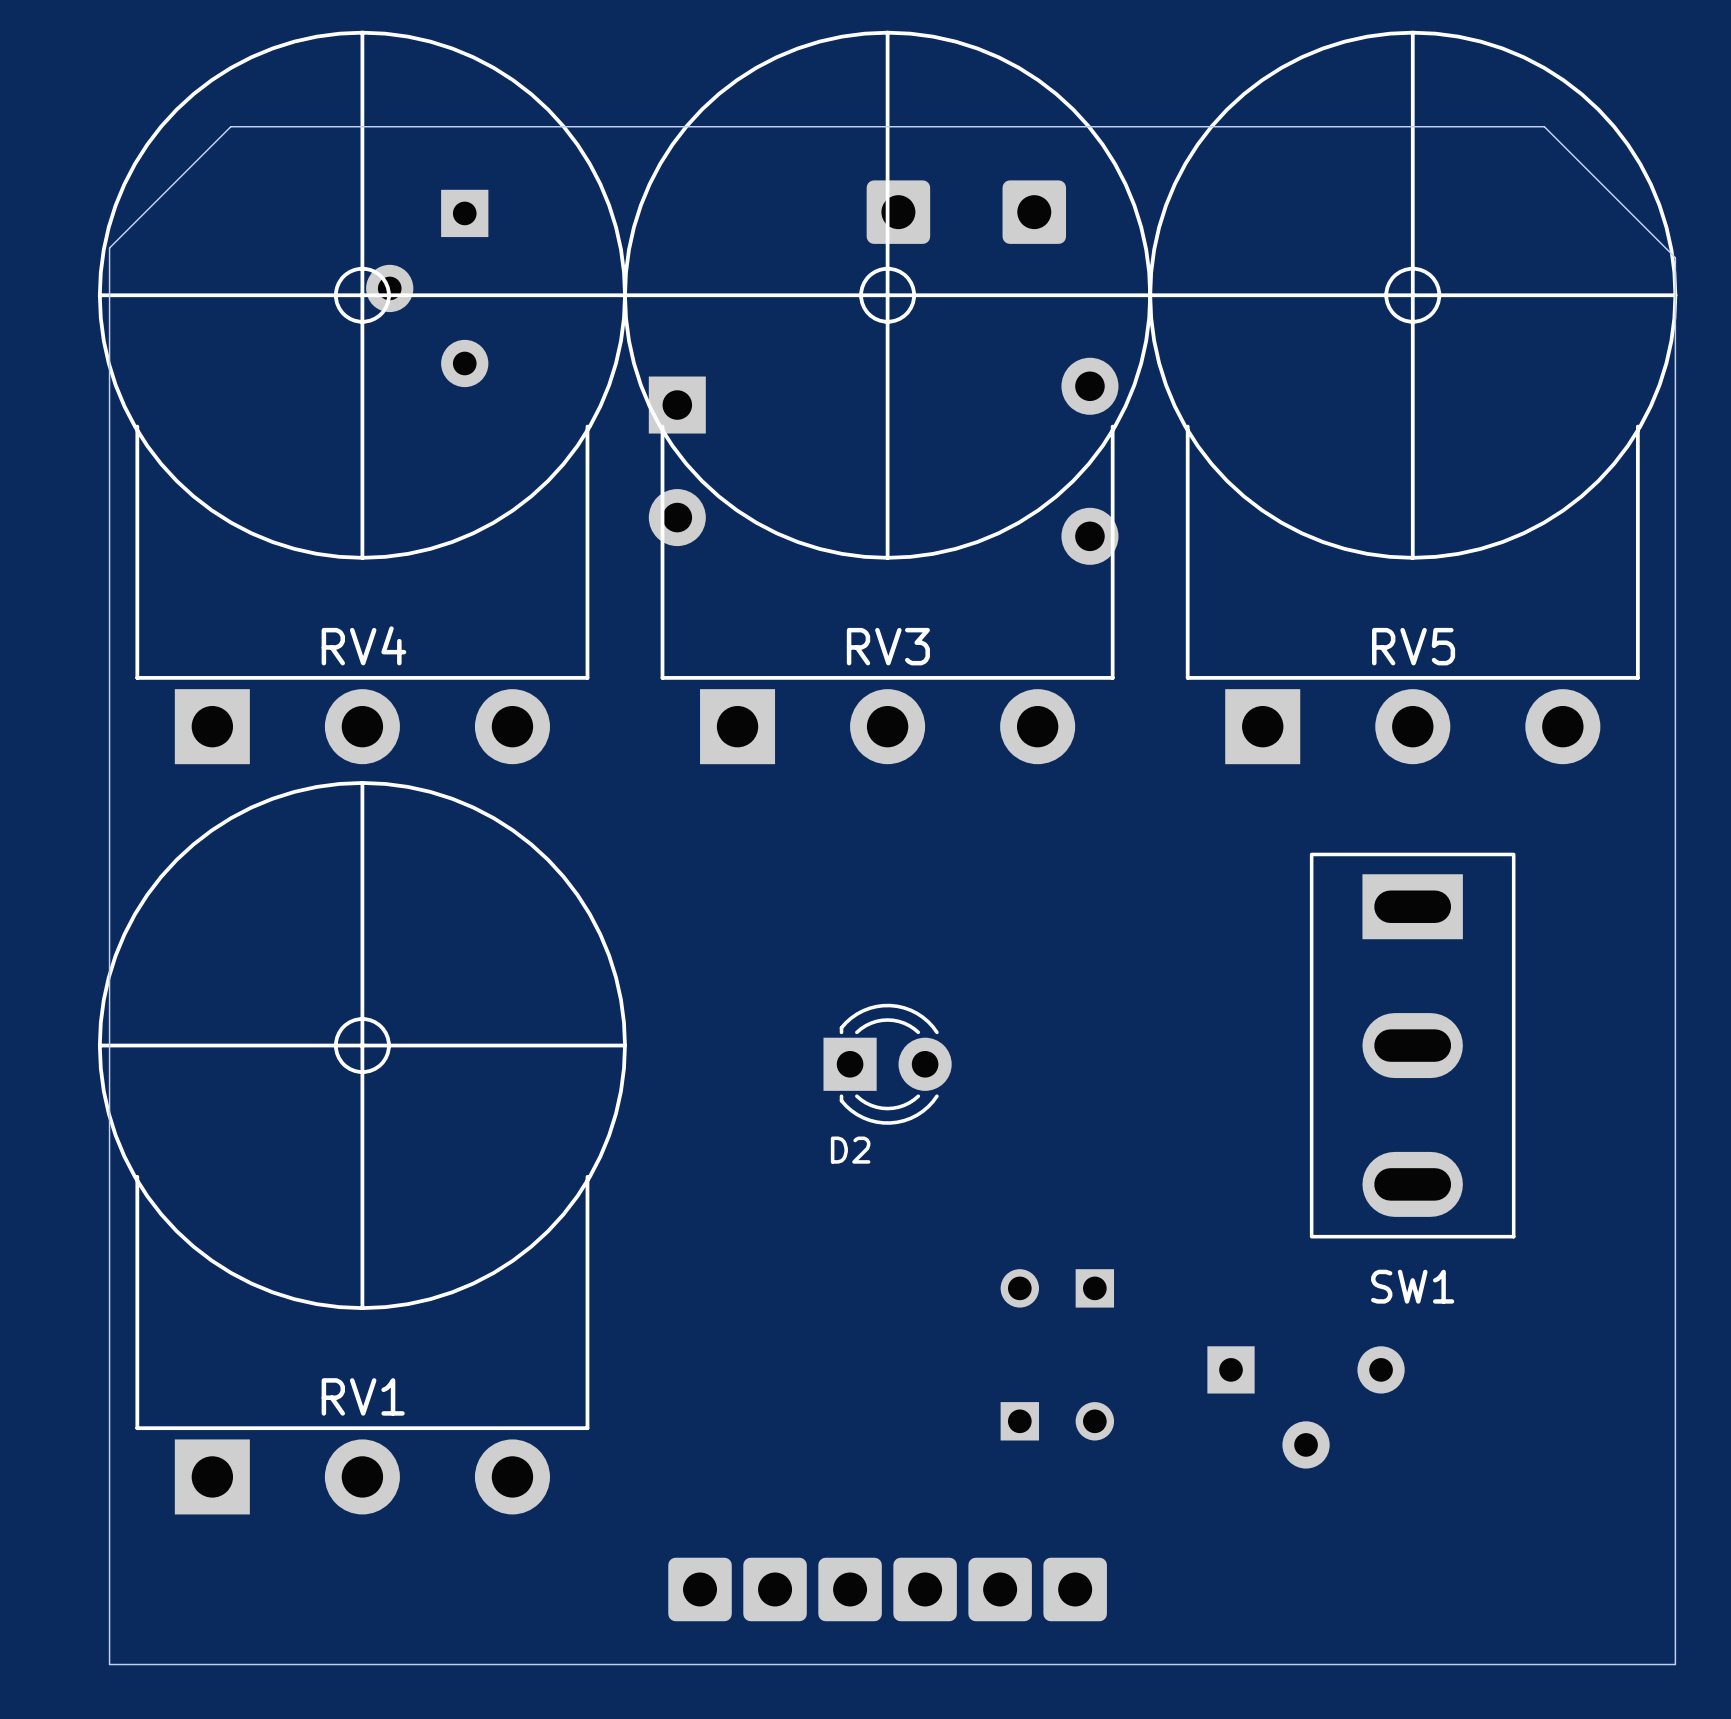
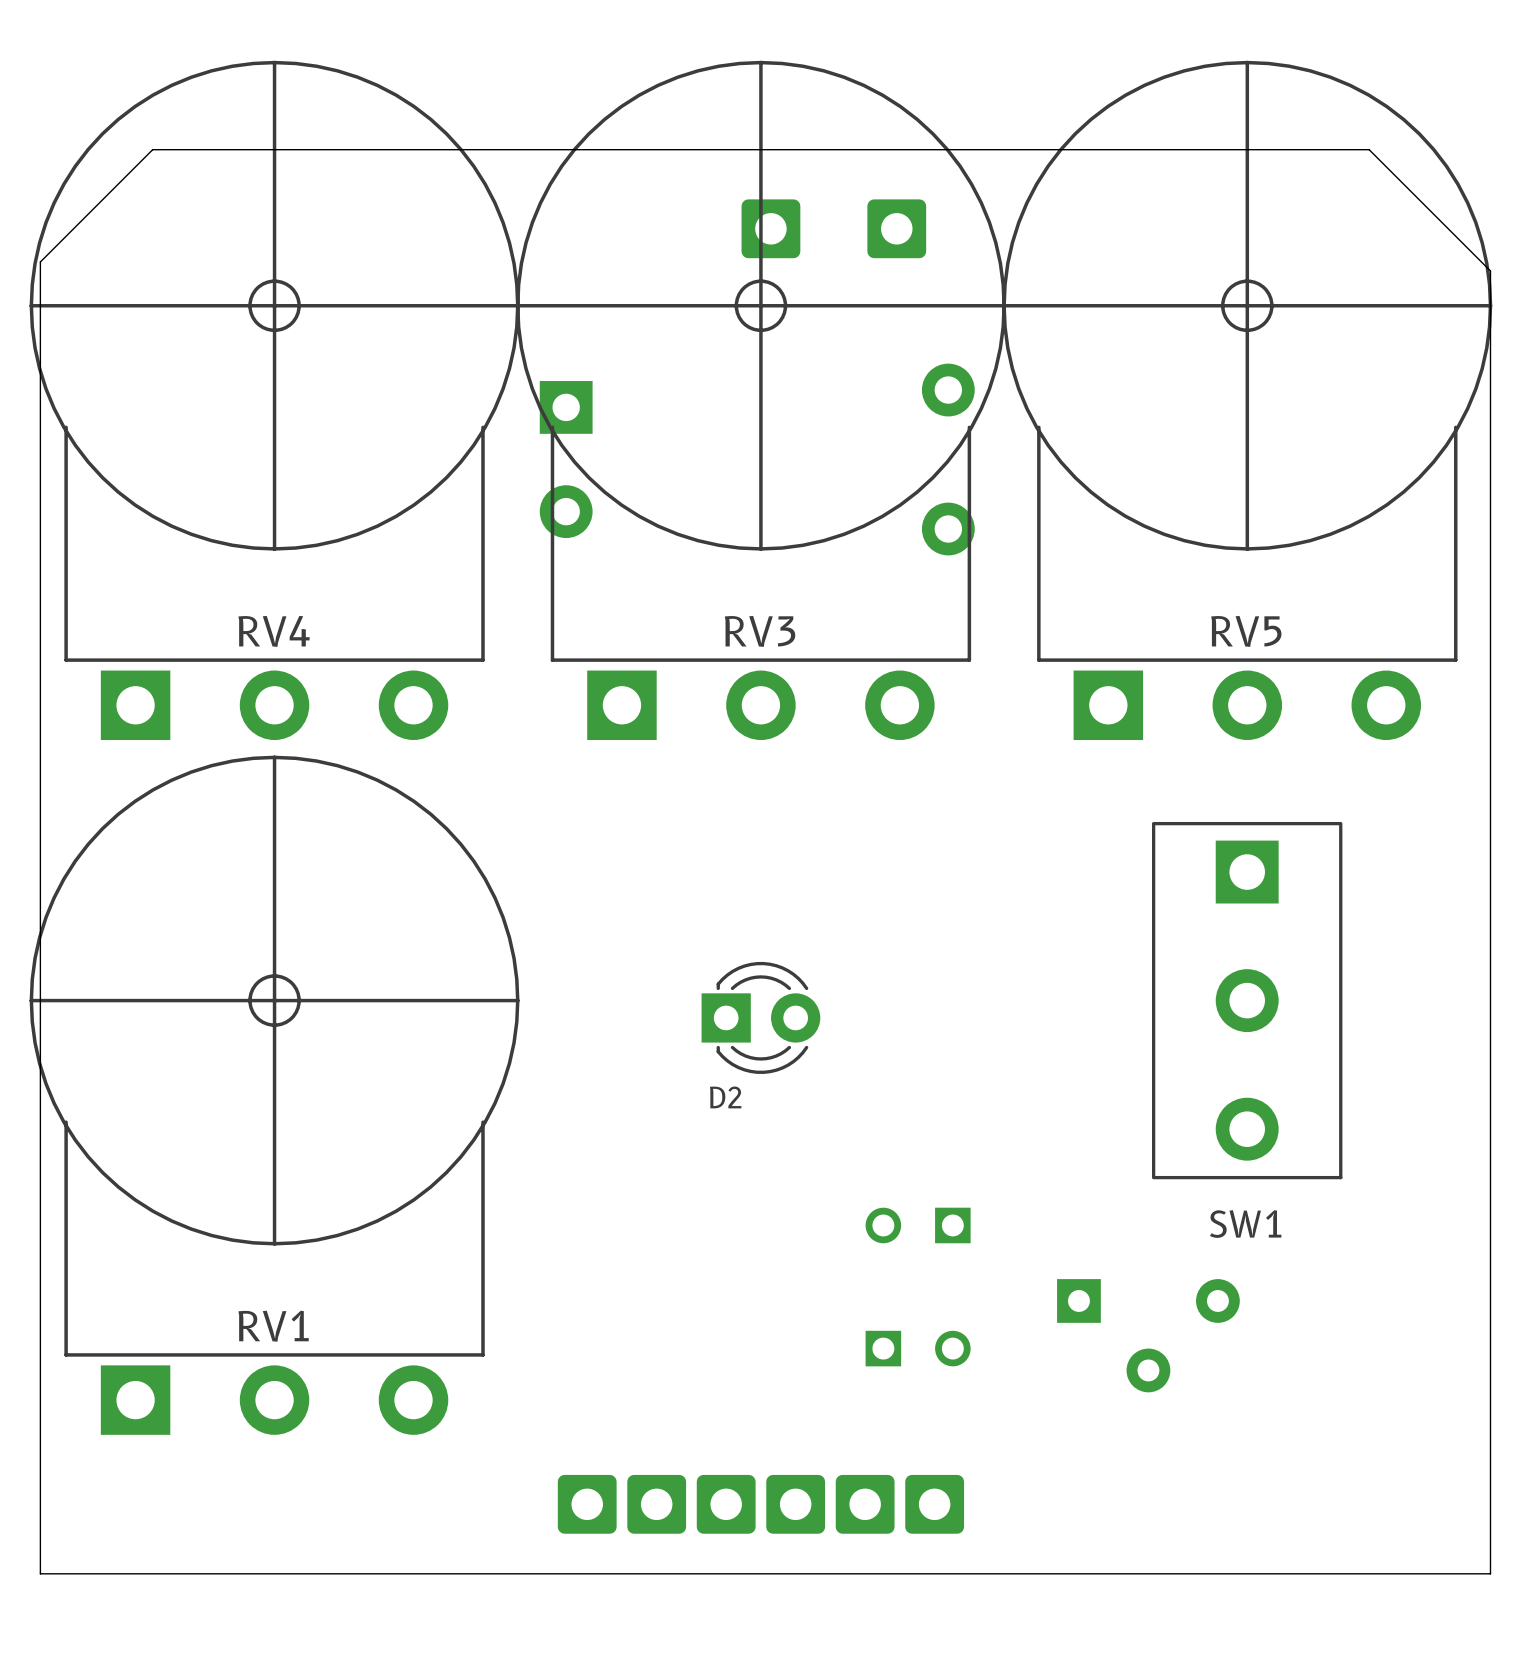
part: (427, 288) -> none
SW1 footprint: [1309, 852, 1516, 1239] -> [1152, 821, 1343, 1180]

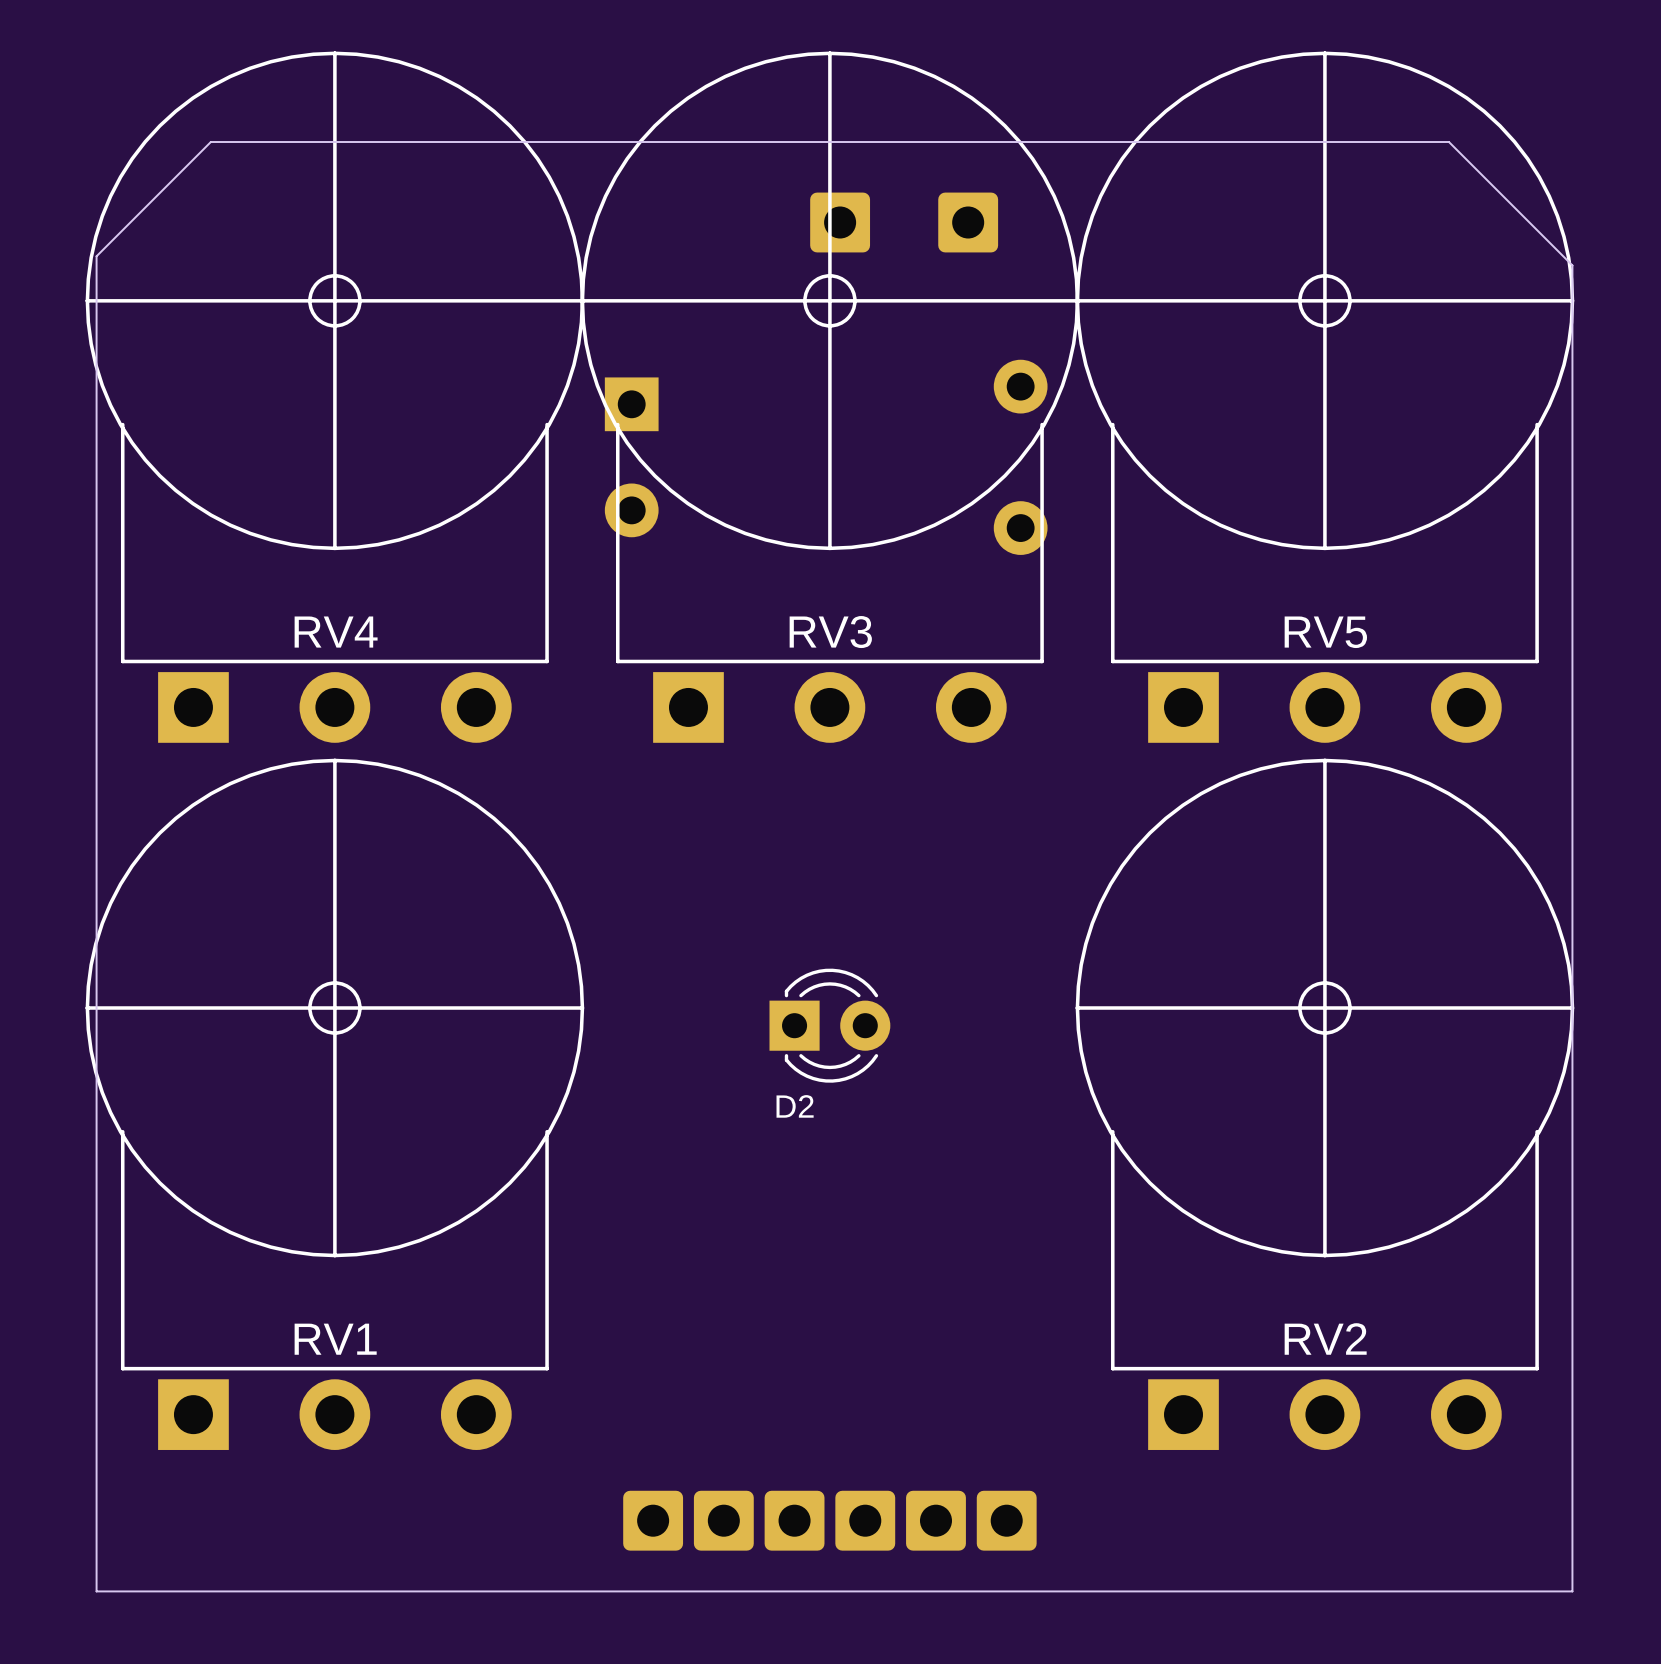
SW1: (1247, 1000) -> none
RV2: none -> (1324, 1104)
part: (918, 1225) -> none
part: (1148, 1335) -> none
part: (918, 1348) -> none

